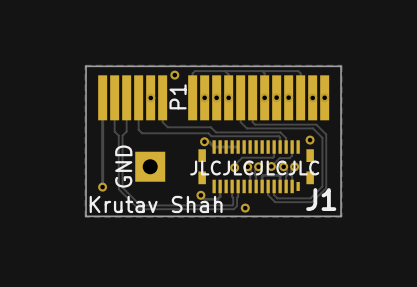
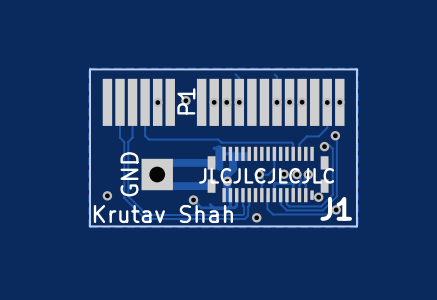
via position: (174, 75) -> (185, 100)
track: (102, 97) (102, 187) -> none
track: (162, 97) (162, 122) (167, 127) (210, 127) (216, 132) (280, 132) (286, 138) -> (327, 102) (327, 127) (318, 136) (306, 136) (299, 144)
track: (192, 97) (192, 73) (194, 71) (298, 71) (300, 73) (300, 97) -> none
track: (240, 97) (240, 122) (246, 128) (313, 128) (322, 137) (322, 186) (310, 198) (276, 197) -> (325, 145) (329, 145) (332, 148) (332, 194) (321, 206) (289, 206)
track: (252, 97) (252, 122) (255, 124) (316, 124) (326, 134) (326, 187) (312, 202) (274, 201) -> (335, 135) (336, 196) (322, 210) (286, 210)
via: none -> (335, 135)
via: (204, 141) -> none
track: none -> (219, 149) (219, 166)
track: none -> (274, 153) (274, 168) (268, 174) (256, 174)
track: (274, 147) (272, 157) (242, 157) (234, 167) -> none
track: (292, 147) (292, 155) (289, 158) (279, 158) (271, 166) -> none
track: none -> (247, 157) (232, 157) (232, 168) (227, 174) (227, 198)
track: none -> (211, 162) (168, 162) (157, 174) (168, 186) (211, 186)
track: (258, 166) (255, 170) (256, 186) -> (336, 209) (331, 214) (273, 214) (267, 208) (268, 195)
via: (258, 166) -> none
via: (234, 167) -> none
via: none -> (227, 181)
track: none -> (236, 195) (236, 205) (234, 207) (201, 207) (193, 200)
via: none -> (318, 197)
via: none -> (193, 200)
via: (200, 195) -> none
via: none -> (336, 209)

